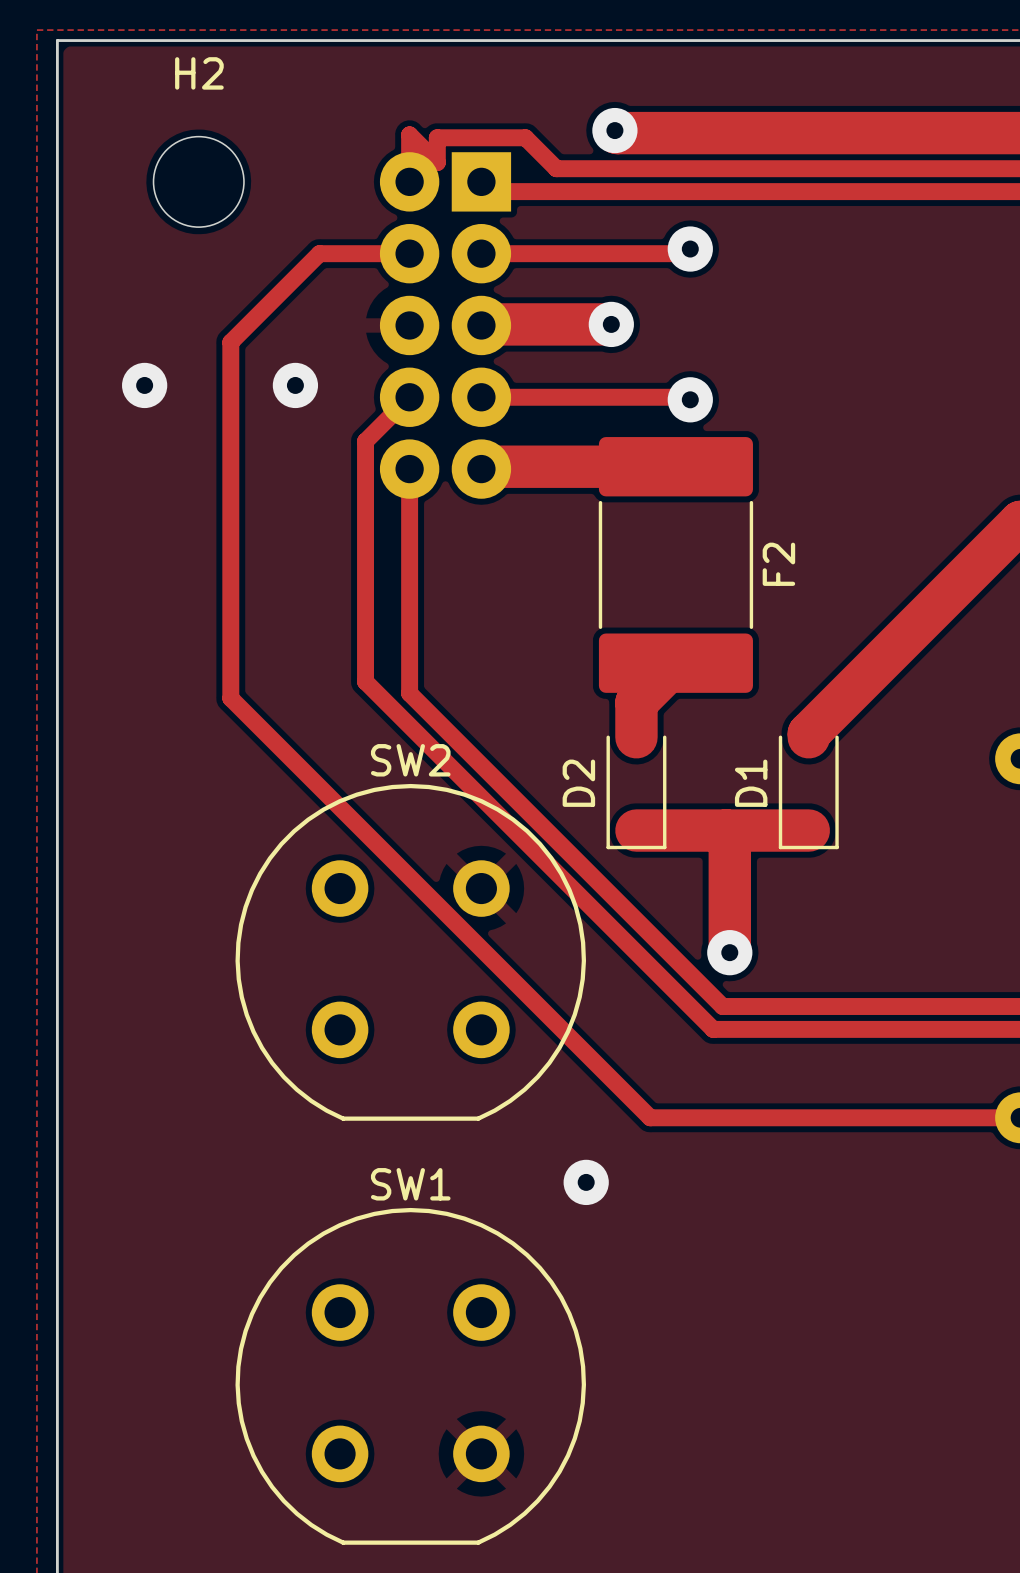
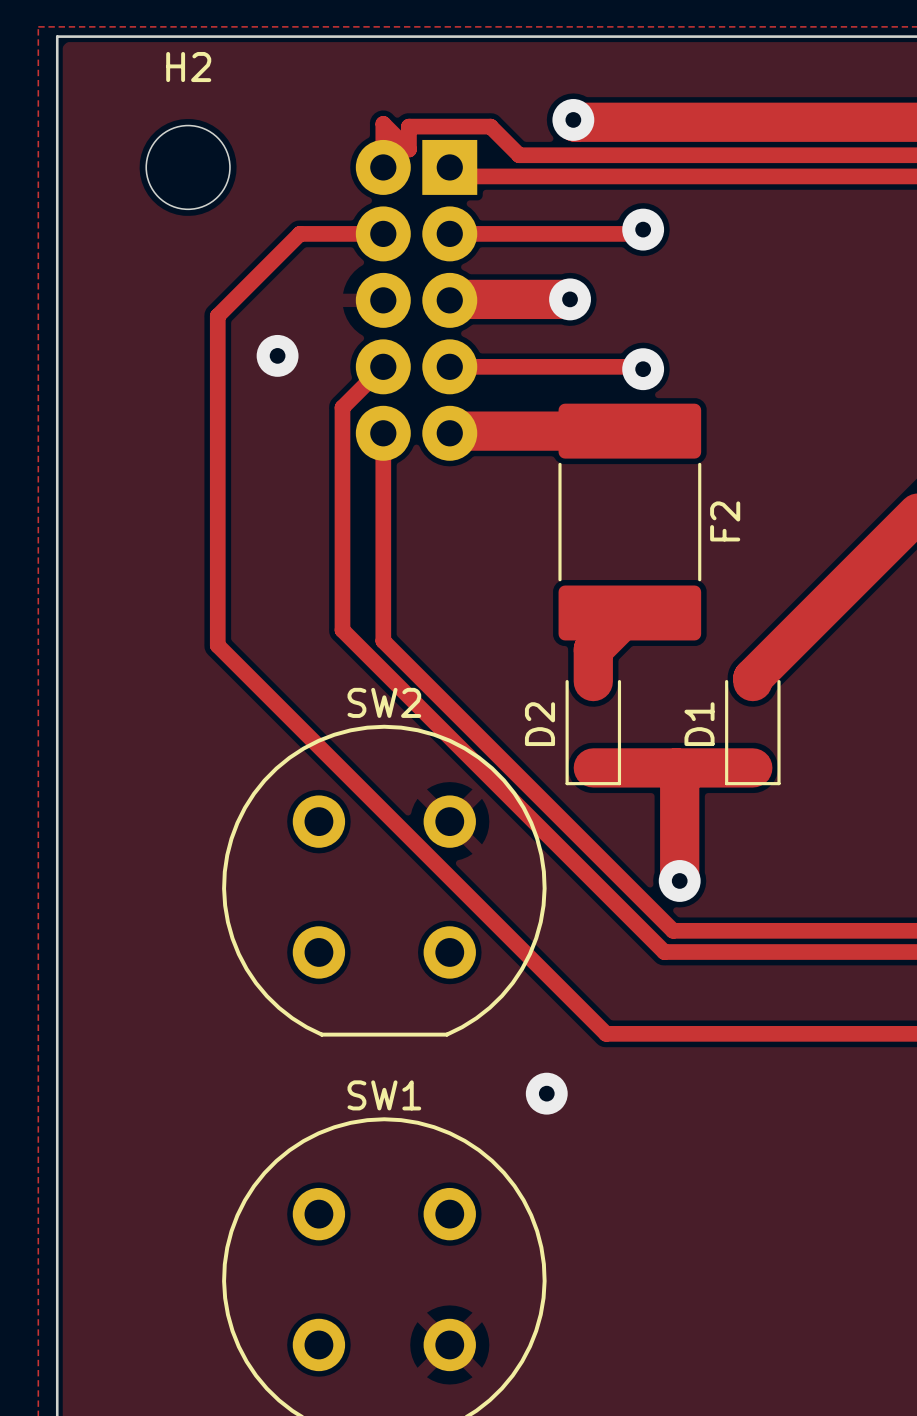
via: (144, 385) -> none

